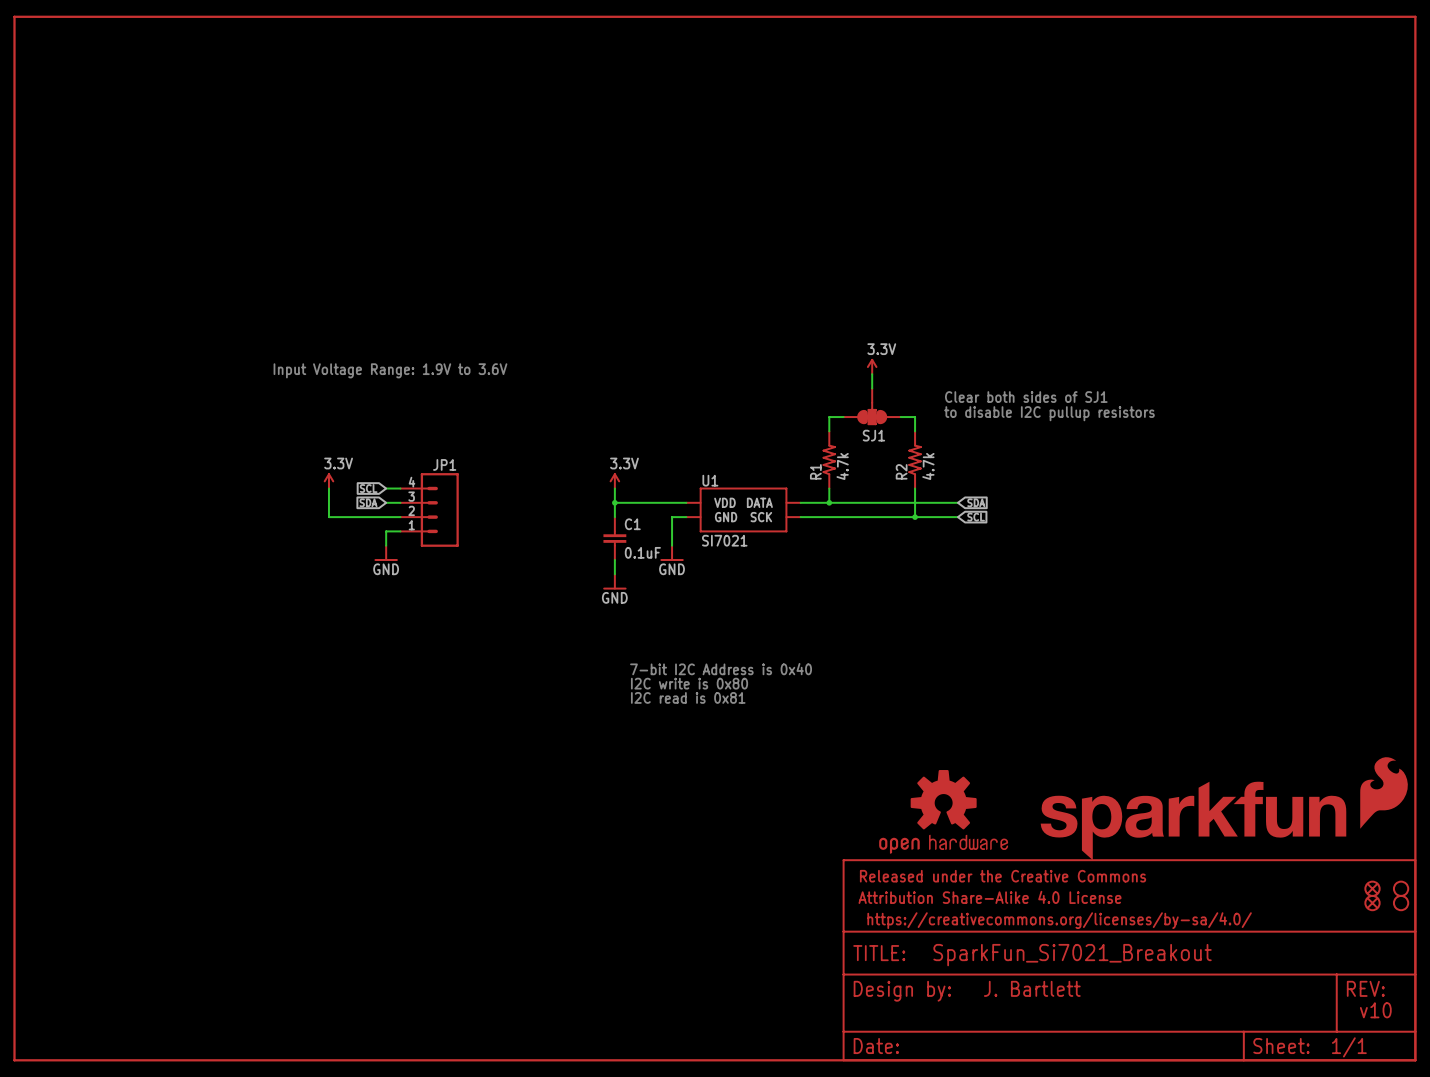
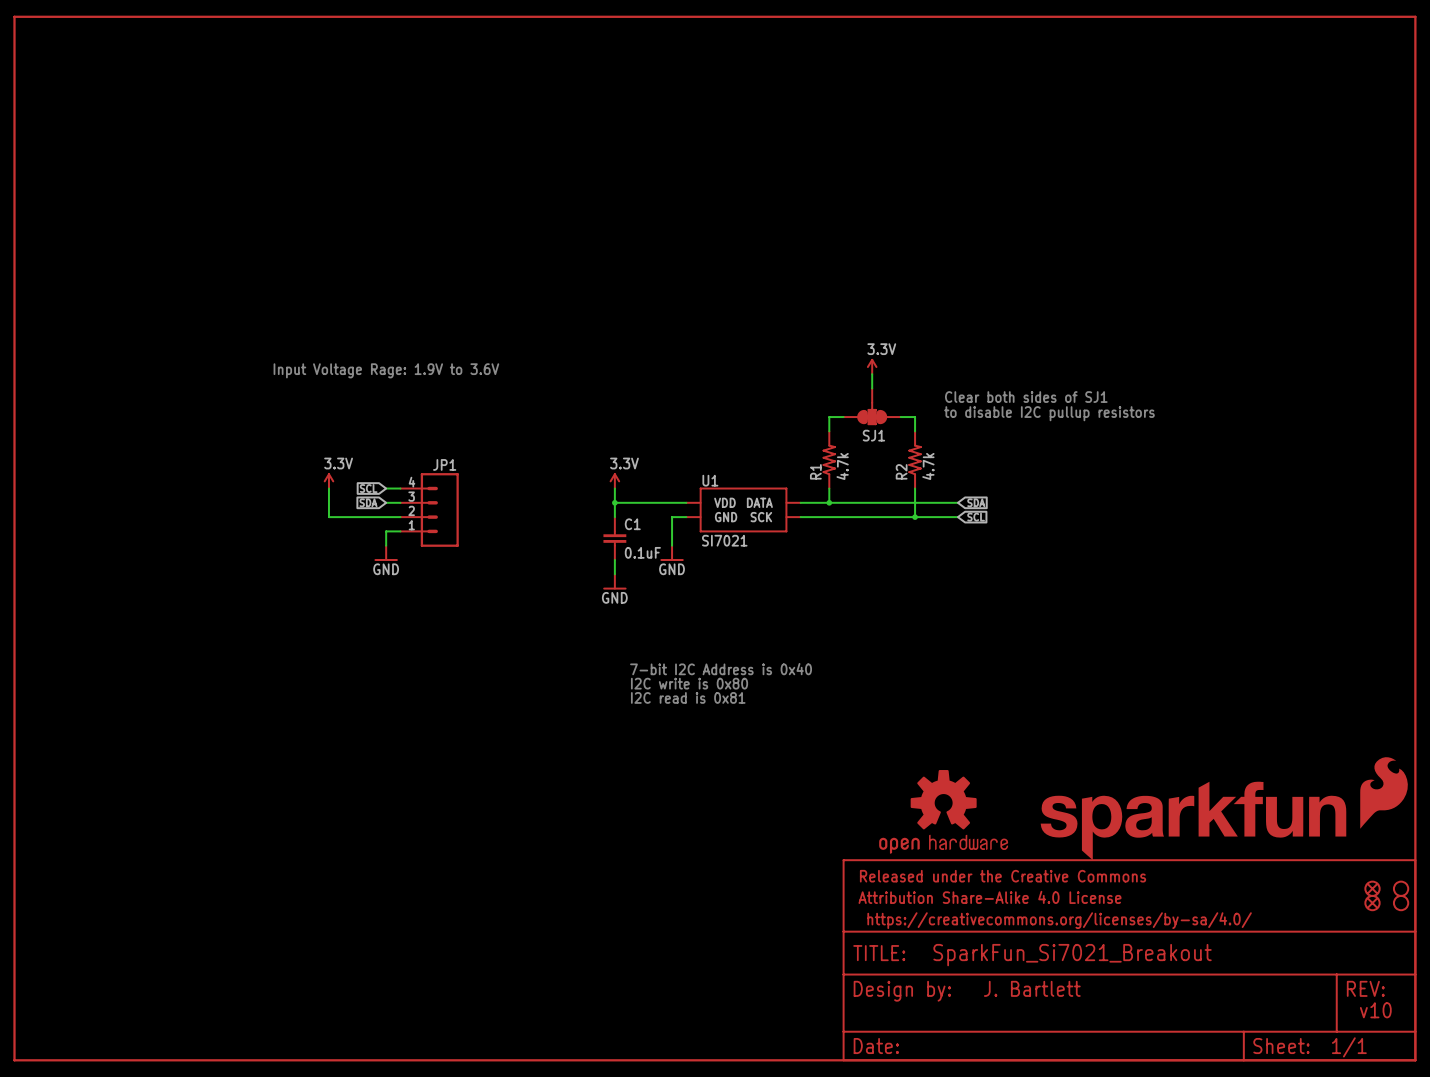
text: Input Voltage Range: 1.9V to 3.6V (390, 370) -> Input Voltage Rage: 1.9V to 3.6V (386, 370)

